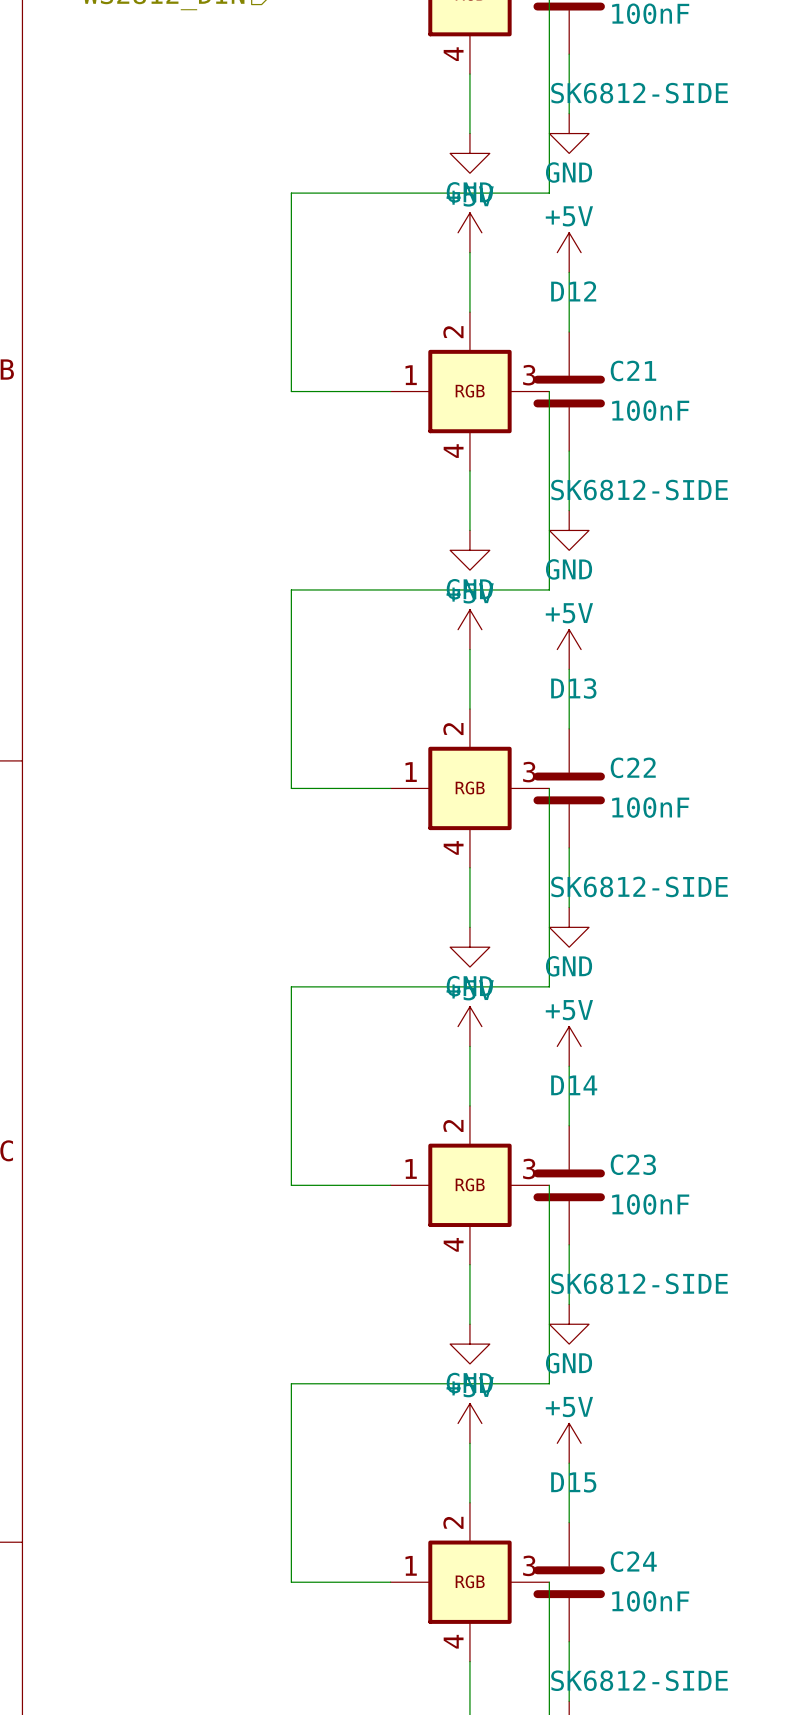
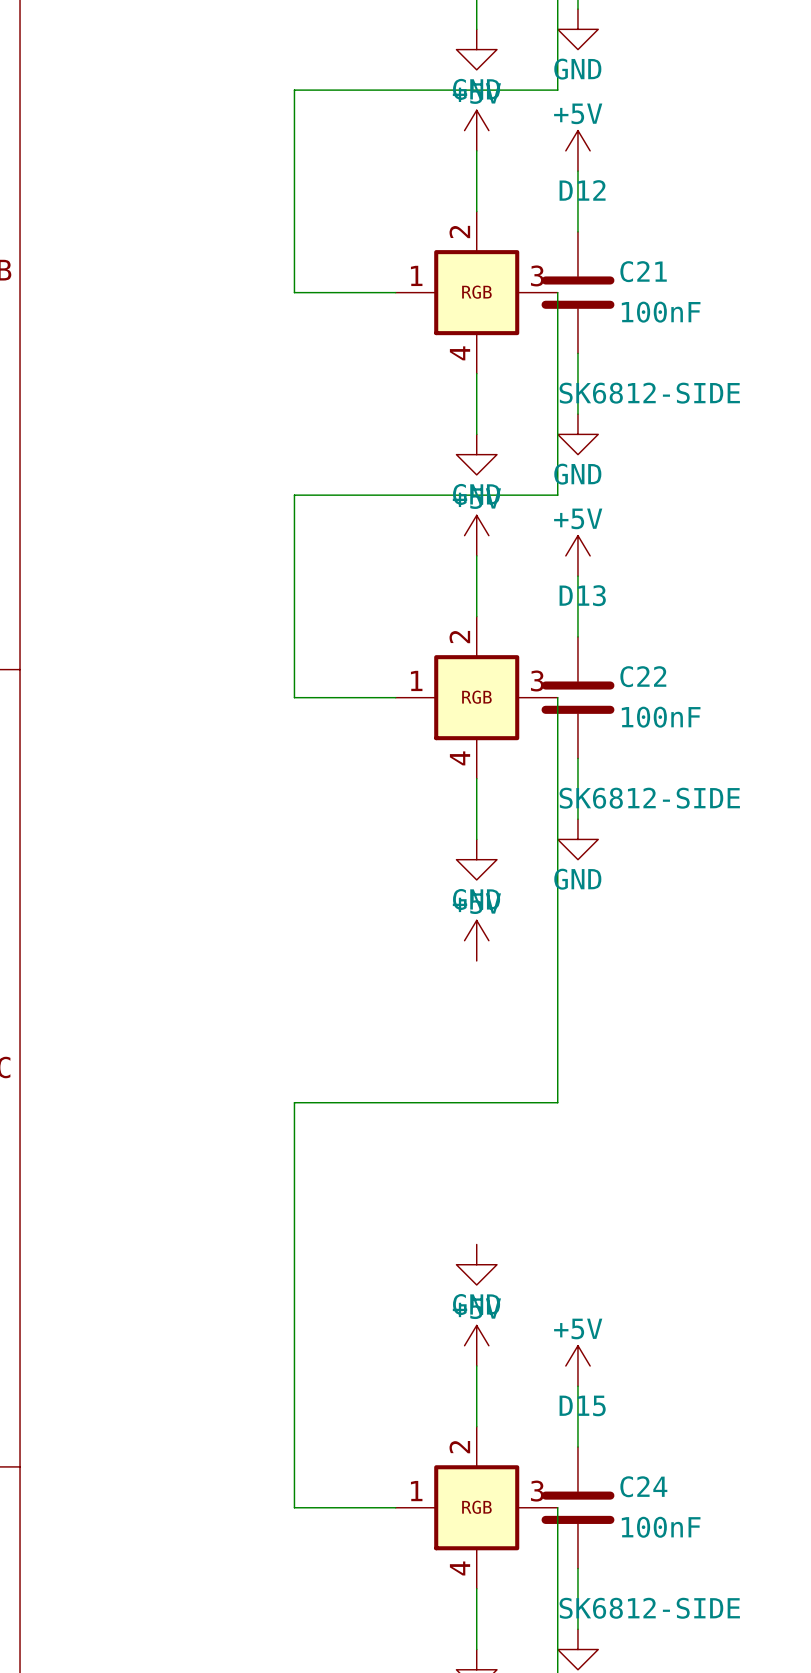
wire: (549, 986) (291, 986) (291, 1185) -> (557, 900) (557, 1102) (395, 1102)
wire: (469, 1046) (469, 1105) -> none
power symbol: +5V (569, 1046) -> none
wire: (569, 1066) (569, 1125) -> none
D14: SK6812-SIDE (469, 1185) -> none
wire: (549, 1185) (549, 1383) (291, 1383) -> (294, 1102) (294, 1305)
C23: 100nF (569, 1185) -> none
wire: (569, 1244) (569, 1304) -> none
wire: (469, 1264) (469, 1324) -> none
power symbol: GND (569, 1324) -> none

